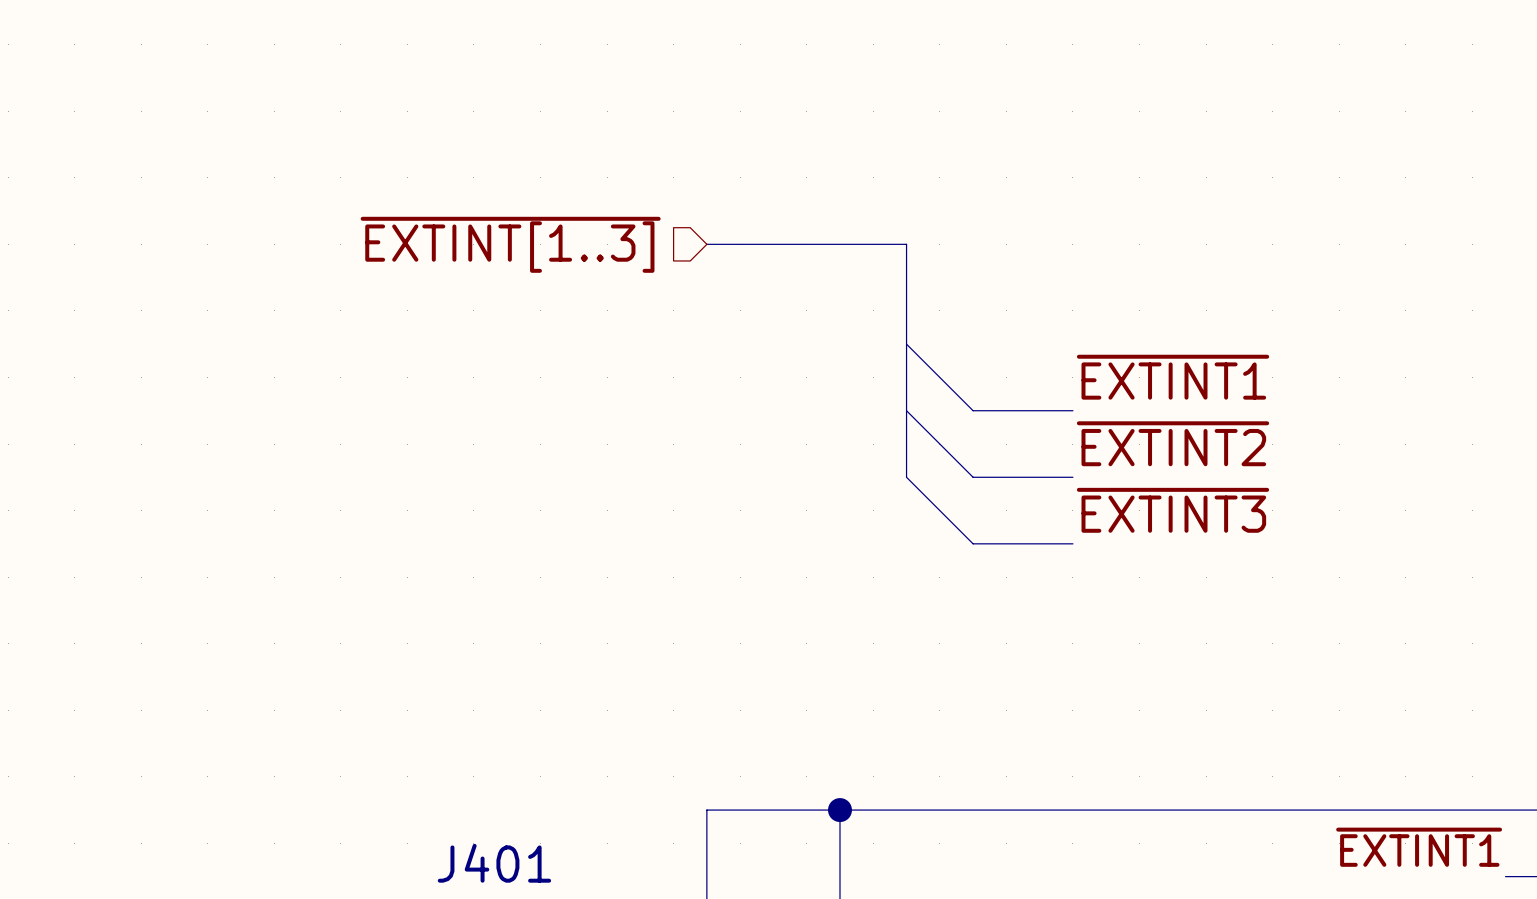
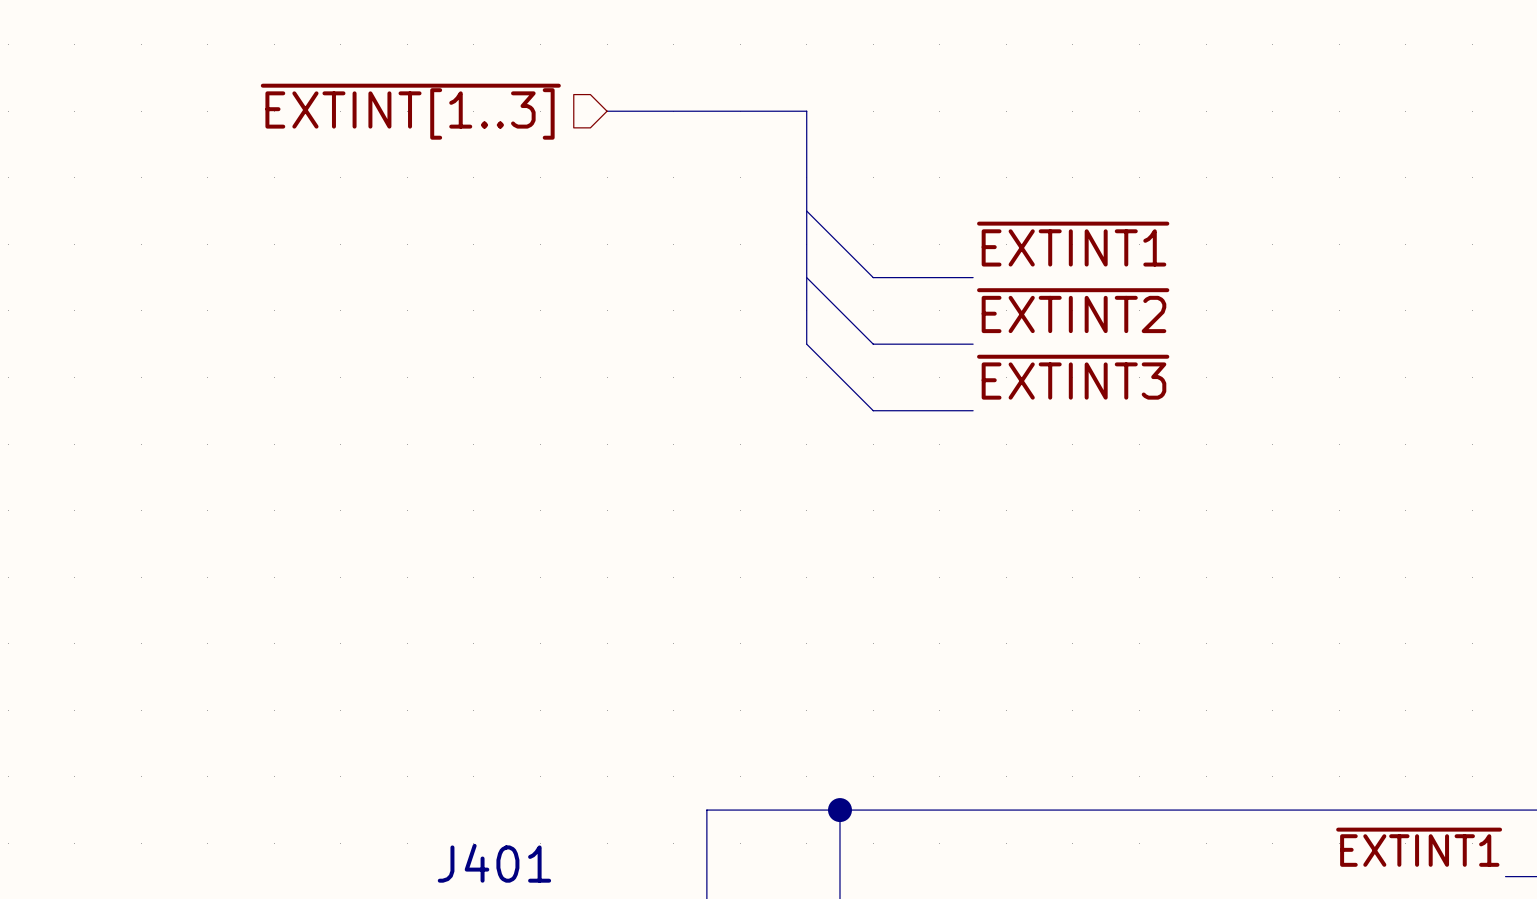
hierarchical label position: ~{EXTINT[1..3]} (510, 244) -> ~{EXTINT[1..3]} (410, 111)
bus: (706, 244) (906, 244) (906, 477) -> (607, 111) (806, 111) (806, 344)
wire: (906, 344) (973, 410) (1072, 410) -> (806, 211) (873, 277) (973, 277)
label position: ~{EXTINT1} (1173, 377) -> ~{EXTINT1} (1073, 244)
wire: (906, 410) (973, 477) (1072, 477) -> (806, 277) (873, 344) (973, 344)
label position: ~{EXTINT2} (1173, 443) -> ~{EXTINT2} (1073, 310)
wire: (906, 477) (973, 543) (1072, 543) -> (806, 344) (873, 410) (973, 410)
label position: ~{EXTINT3} (1173, 510) -> ~{EXTINT3} (1073, 377)

